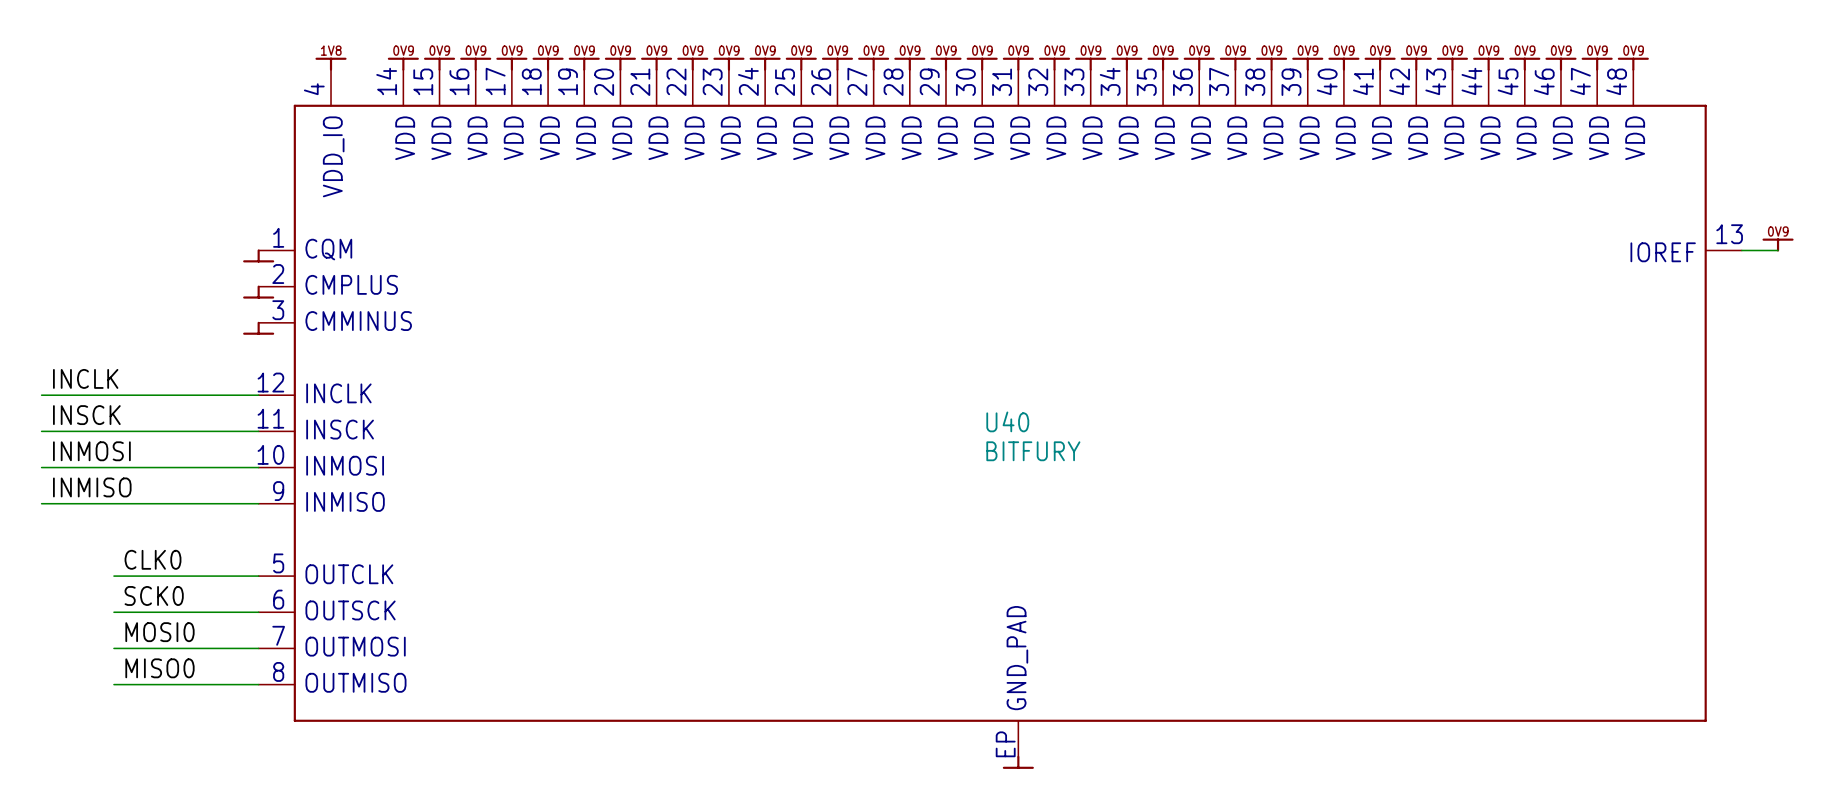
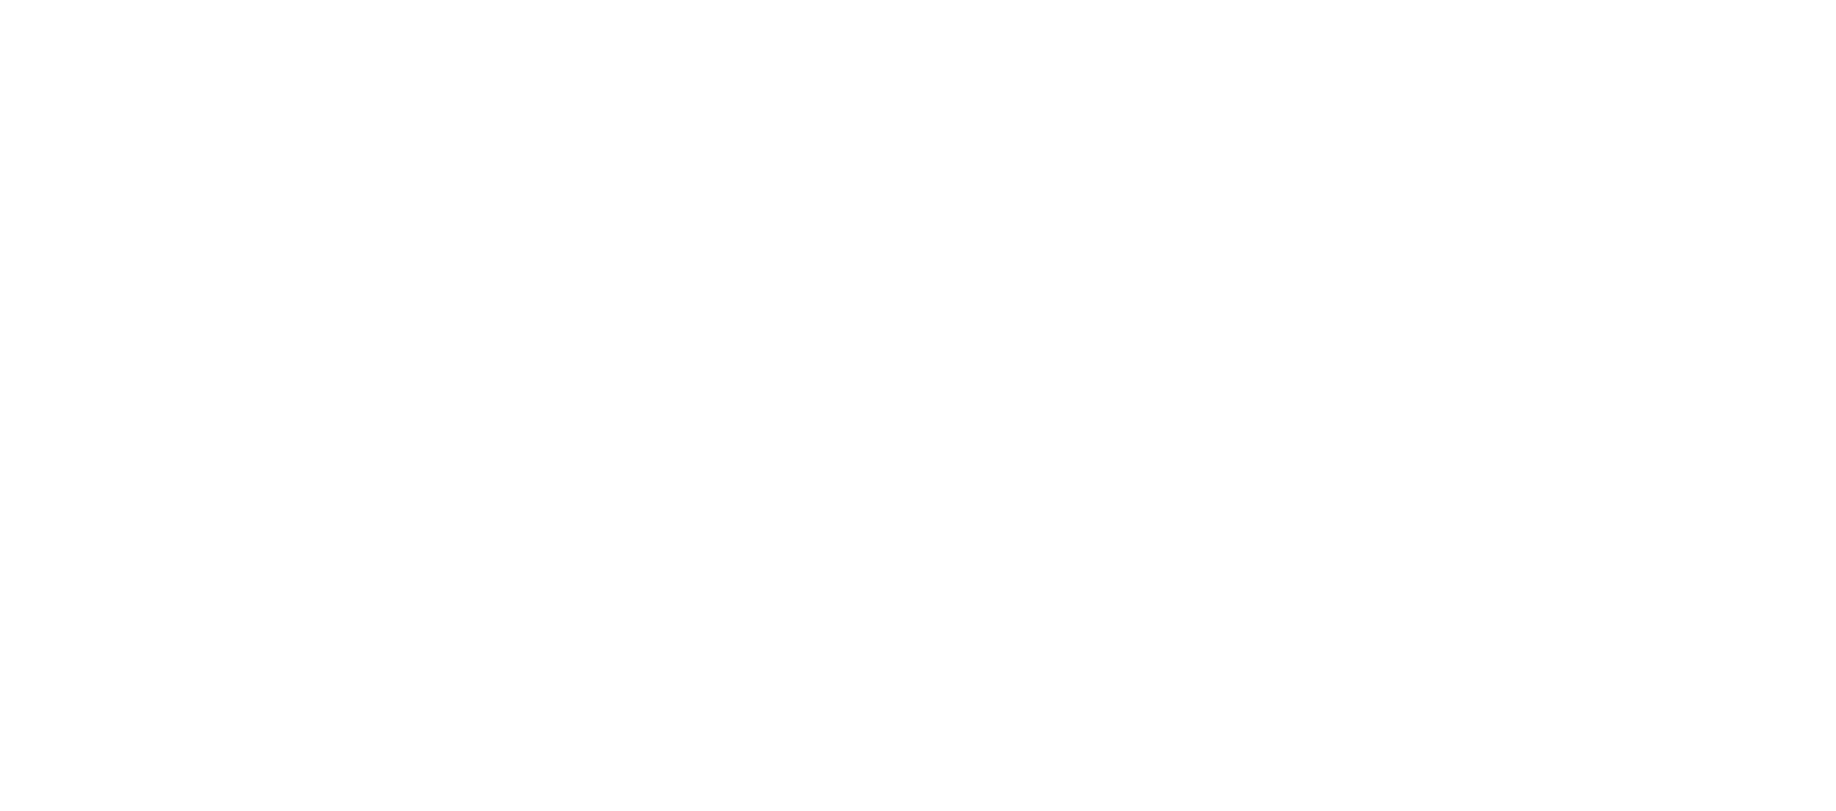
power symbol: (331, 64) -> none
power symbol: (403, 64) -> none
power symbol: (439, 64) -> none
power symbol: (475, 64) -> none
power symbol: (511, 64) -> none
power symbol: (548, 64) -> none
power symbol: (584, 64) -> none
power symbol: (620, 64) -> none
power symbol: (656, 64) -> none
power symbol: (692, 64) -> none
power symbol: (728, 64) -> none
power symbol: (765, 64) -> none
power symbol: (801, 64) -> none
power symbol: (837, 64) -> none
power symbol: (873, 64) -> none
power symbol: (909, 64) -> none
power symbol: (946, 64) -> none
power symbol: (982, 64) -> none
power symbol: (1018, 64) -> none
power symbol: (1054, 64) -> none
power symbol: (1090, 64) -> none
power symbol: (1126, 64) -> none
power symbol: (1163, 64) -> none
power symbol: (1199, 64) -> none
power symbol: (1235, 64) -> none
power symbol: (1271, 64) -> none
power symbol: (1307, 64) -> none
power symbol: (1343, 64) -> none
power symbol: (1380, 64) -> none
power symbol: (1416, 64) -> none
power symbol: (1452, 64) -> none
power symbol: (1488, 64) -> none
power symbol: (1524, 64) -> none
power symbol: (1560, 64) -> none
power symbol: (1597, 64) -> none
power symbol: (1633, 64) -> none
power symbol: (1778, 245) -> none
wire: (1741, 250) (1778, 250) -> none
power symbol: (258, 255) -> none
power symbol: (258, 292) -> none
power symbol: (258, 328) -> none
label: INCLK (85, 378) -> none
wire: (41, 395) (258, 395) -> none
U40: BITFURY (1000, 413) -> none
label: INSCK (86, 415) -> none
wire: (41, 431) (258, 431) -> none
label: INMOSI (91, 451) -> none
wire: (41, 467) (258, 467) -> none
label: INMISO (92, 487) -> none
wire: (41, 503) (258, 503) -> none
label: CLK0 (153, 559) -> none
wire: (113, 576) (258, 576) -> none
label: SCK0 (154, 595) -> none
wire: (113, 612) (258, 612) -> none
label: MOSI0 (159, 632) -> none
wire: (113, 648) (258, 648) -> none
label: MISO0 (159, 668) -> none
wire: (113, 684) (258, 684) -> none
power symbol: (1018, 762) -> none

